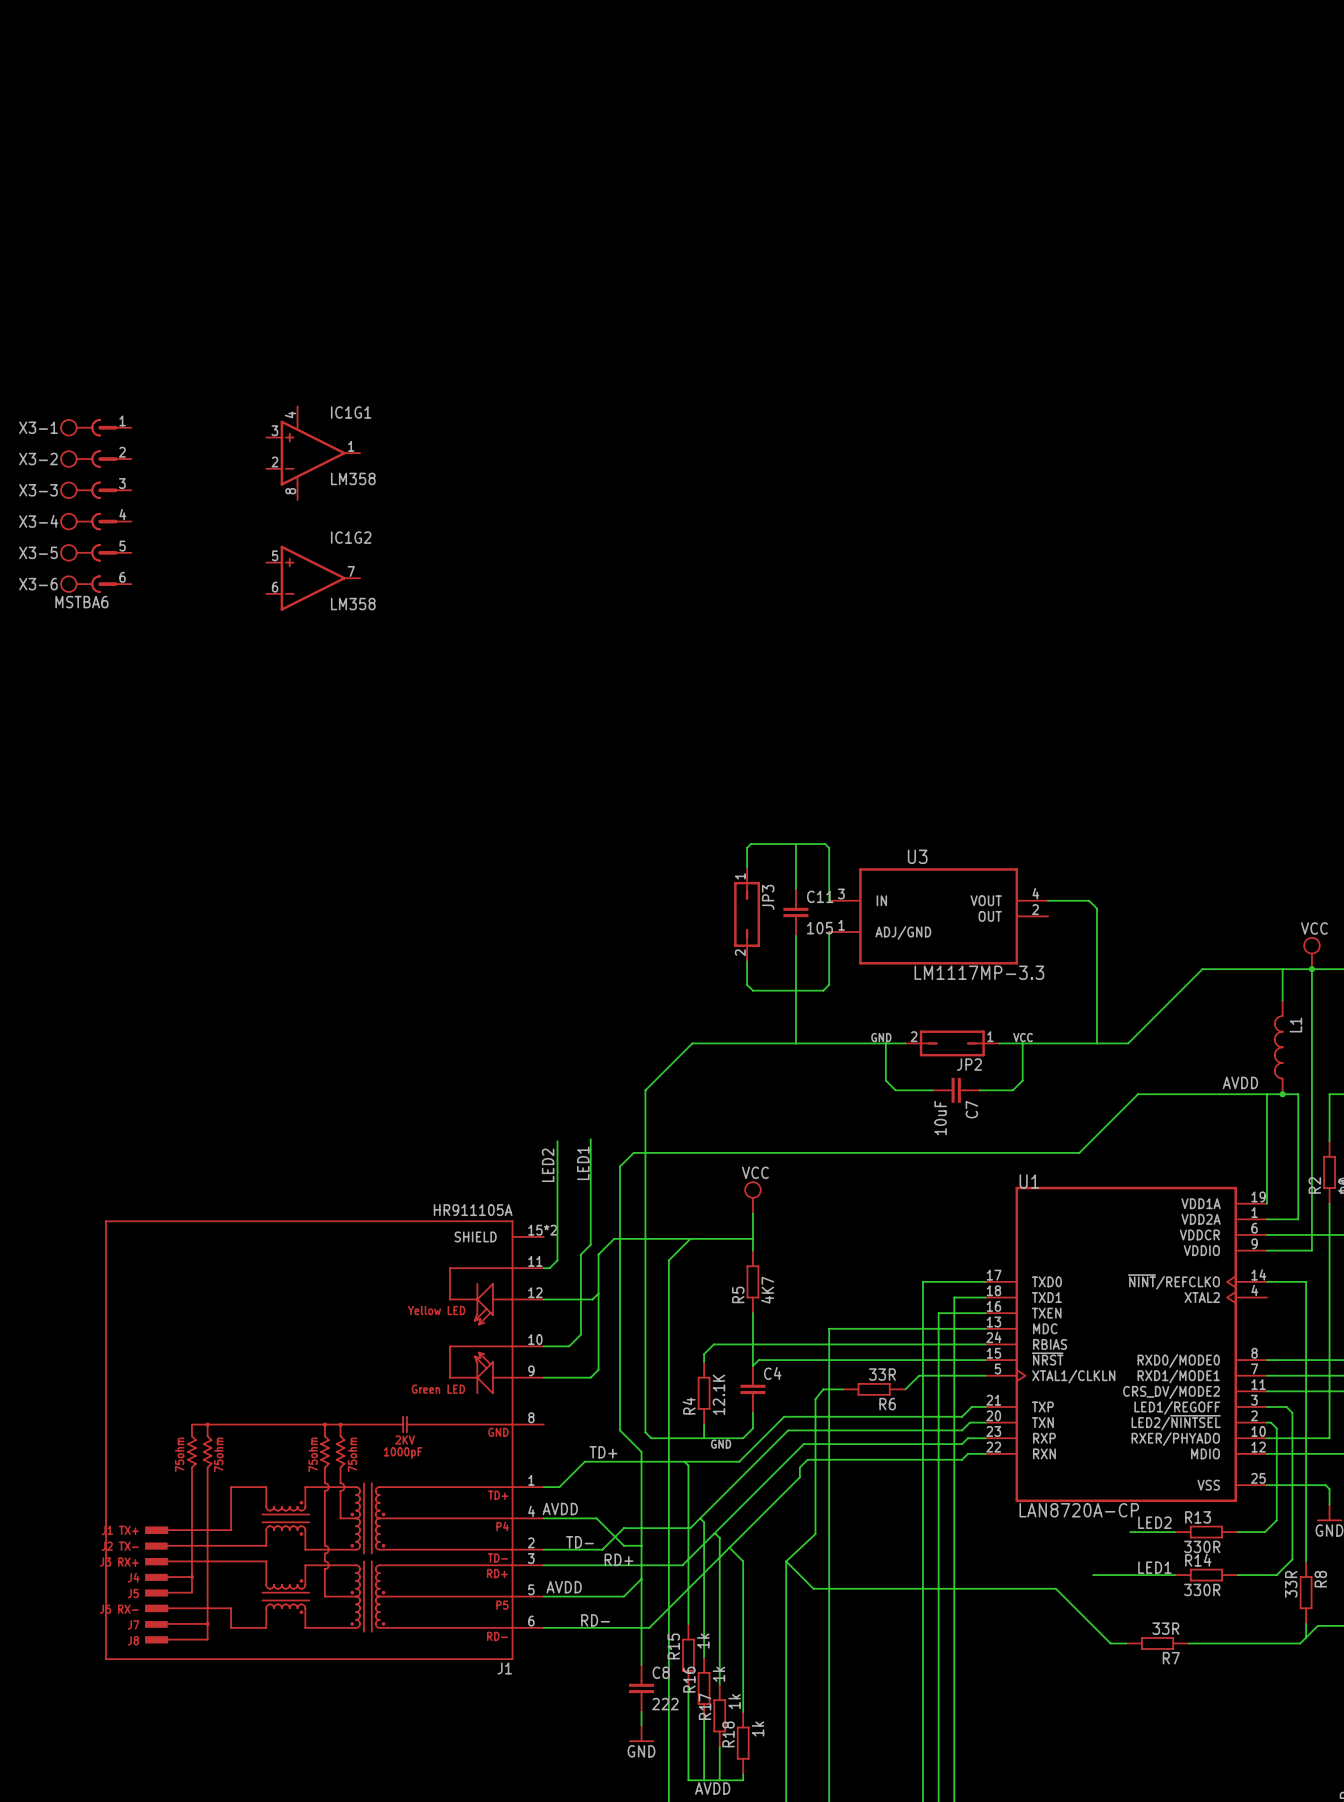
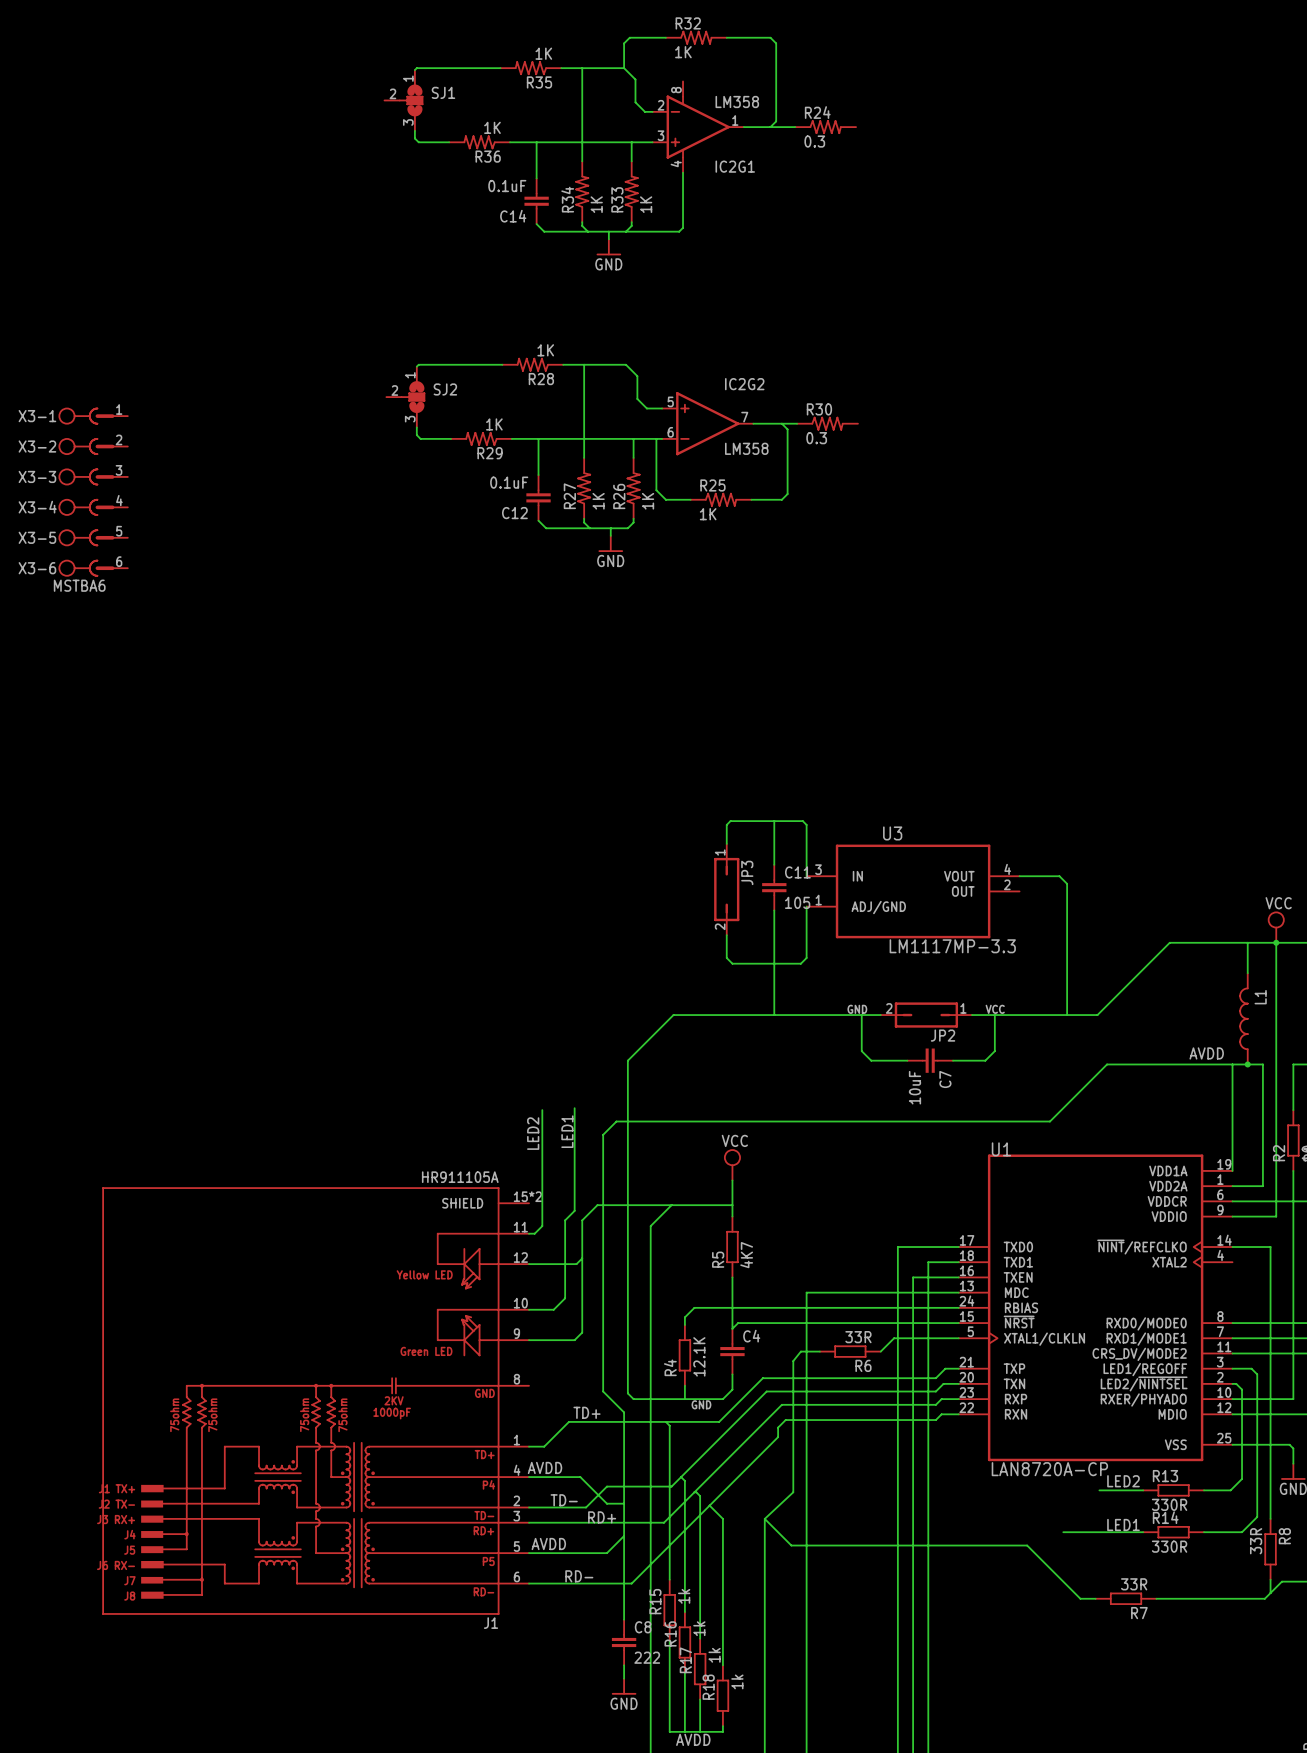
wire: none -> (665, 37) (629, 37) (624, 43) (624, 68)
R32: none -> 1K (696, 37)
wire: none -> (726, 37) (770, 37) (776, 43) (776, 121) (770, 127)
wire: none -> (500, 68) (416, 68) (414, 70)
R35: none -> 1K (530, 68)
wire: none -> (561, 68) (624, 68)
wire: none -> (582, 68) (582, 161)
wire: none -> (624, 68) (635, 79) (635, 102) (644, 111) (652, 111)
SJ1: none -> (403, 100)
IC2G1: none -> LM358 (698, 127)
wire: none -> (743, 127) (795, 127)
R24: none -> 0.3 (825, 127)
wire: none -> (414, 130) (414, 138) (418, 142) (449, 142)
R36: none -> 1K (479, 142)
wire: none -> (509, 142) (652, 142)
wire: none -> (536, 142) (536, 178)
wire: none -> (631, 142) (631, 161)
wire: none -> (683, 172) (683, 227) (679, 231) (544, 231) (536, 224)
R34: none -> 1K (582, 191)
R33: none -> 1K (631, 191)
C14: none -> 0.1uF (536, 201)
wire: none -> (582, 222) (582, 225) (587, 231)
wire: none -> (631, 222) (631, 225) (625, 231)
wire: none -> (608, 231) (608, 239)
power symbol: none -> GND (608, 247)
wire: none -> (502, 364) (418, 364) (416, 366)
R28: none -> 1K (532, 364)
wire: none -> (563, 364) (625, 364) (637, 376) (637, 398) (646, 408) (662, 408)
wire: none -> (584, 364) (584, 457)
SJ2: none -> (405, 397)
IC2G2: none -> LM358 (707, 423)
wire: none -> (753, 423) (797, 423)
wire: none -> (781, 423) (787, 429) (787, 494) (781, 499) (751, 499)
R30: none -> 0.3 (827, 423)
wire: none -> (416, 427) (416, 435) (420, 438) (451, 438)
R29: none -> 1K (481, 438)
wire: none -> (511, 438) (662, 438)
wire: none -> (538, 438) (538, 475)
wire: none -> (633, 438) (633, 457)
wire: none -> (656, 438) (656, 490) (665, 499) (690, 499)
IC1G1: LM358 (313, 453) -> none
R27: none -> 1K (584, 488)
R26: none -> 1K (633, 488)
C12: none -> 0.1uF (538, 497)
R25: none -> 1K (721, 499)
wire: none -> (584, 518) (584, 522) (589, 528)
wire: none -> (633, 518) (633, 522) (627, 528) (546, 528) (538, 520)
wire: none -> (610, 528) (610, 535)
power symbol: none -> GND (610, 543)
IC1G2: LM358 (313, 578) -> none

